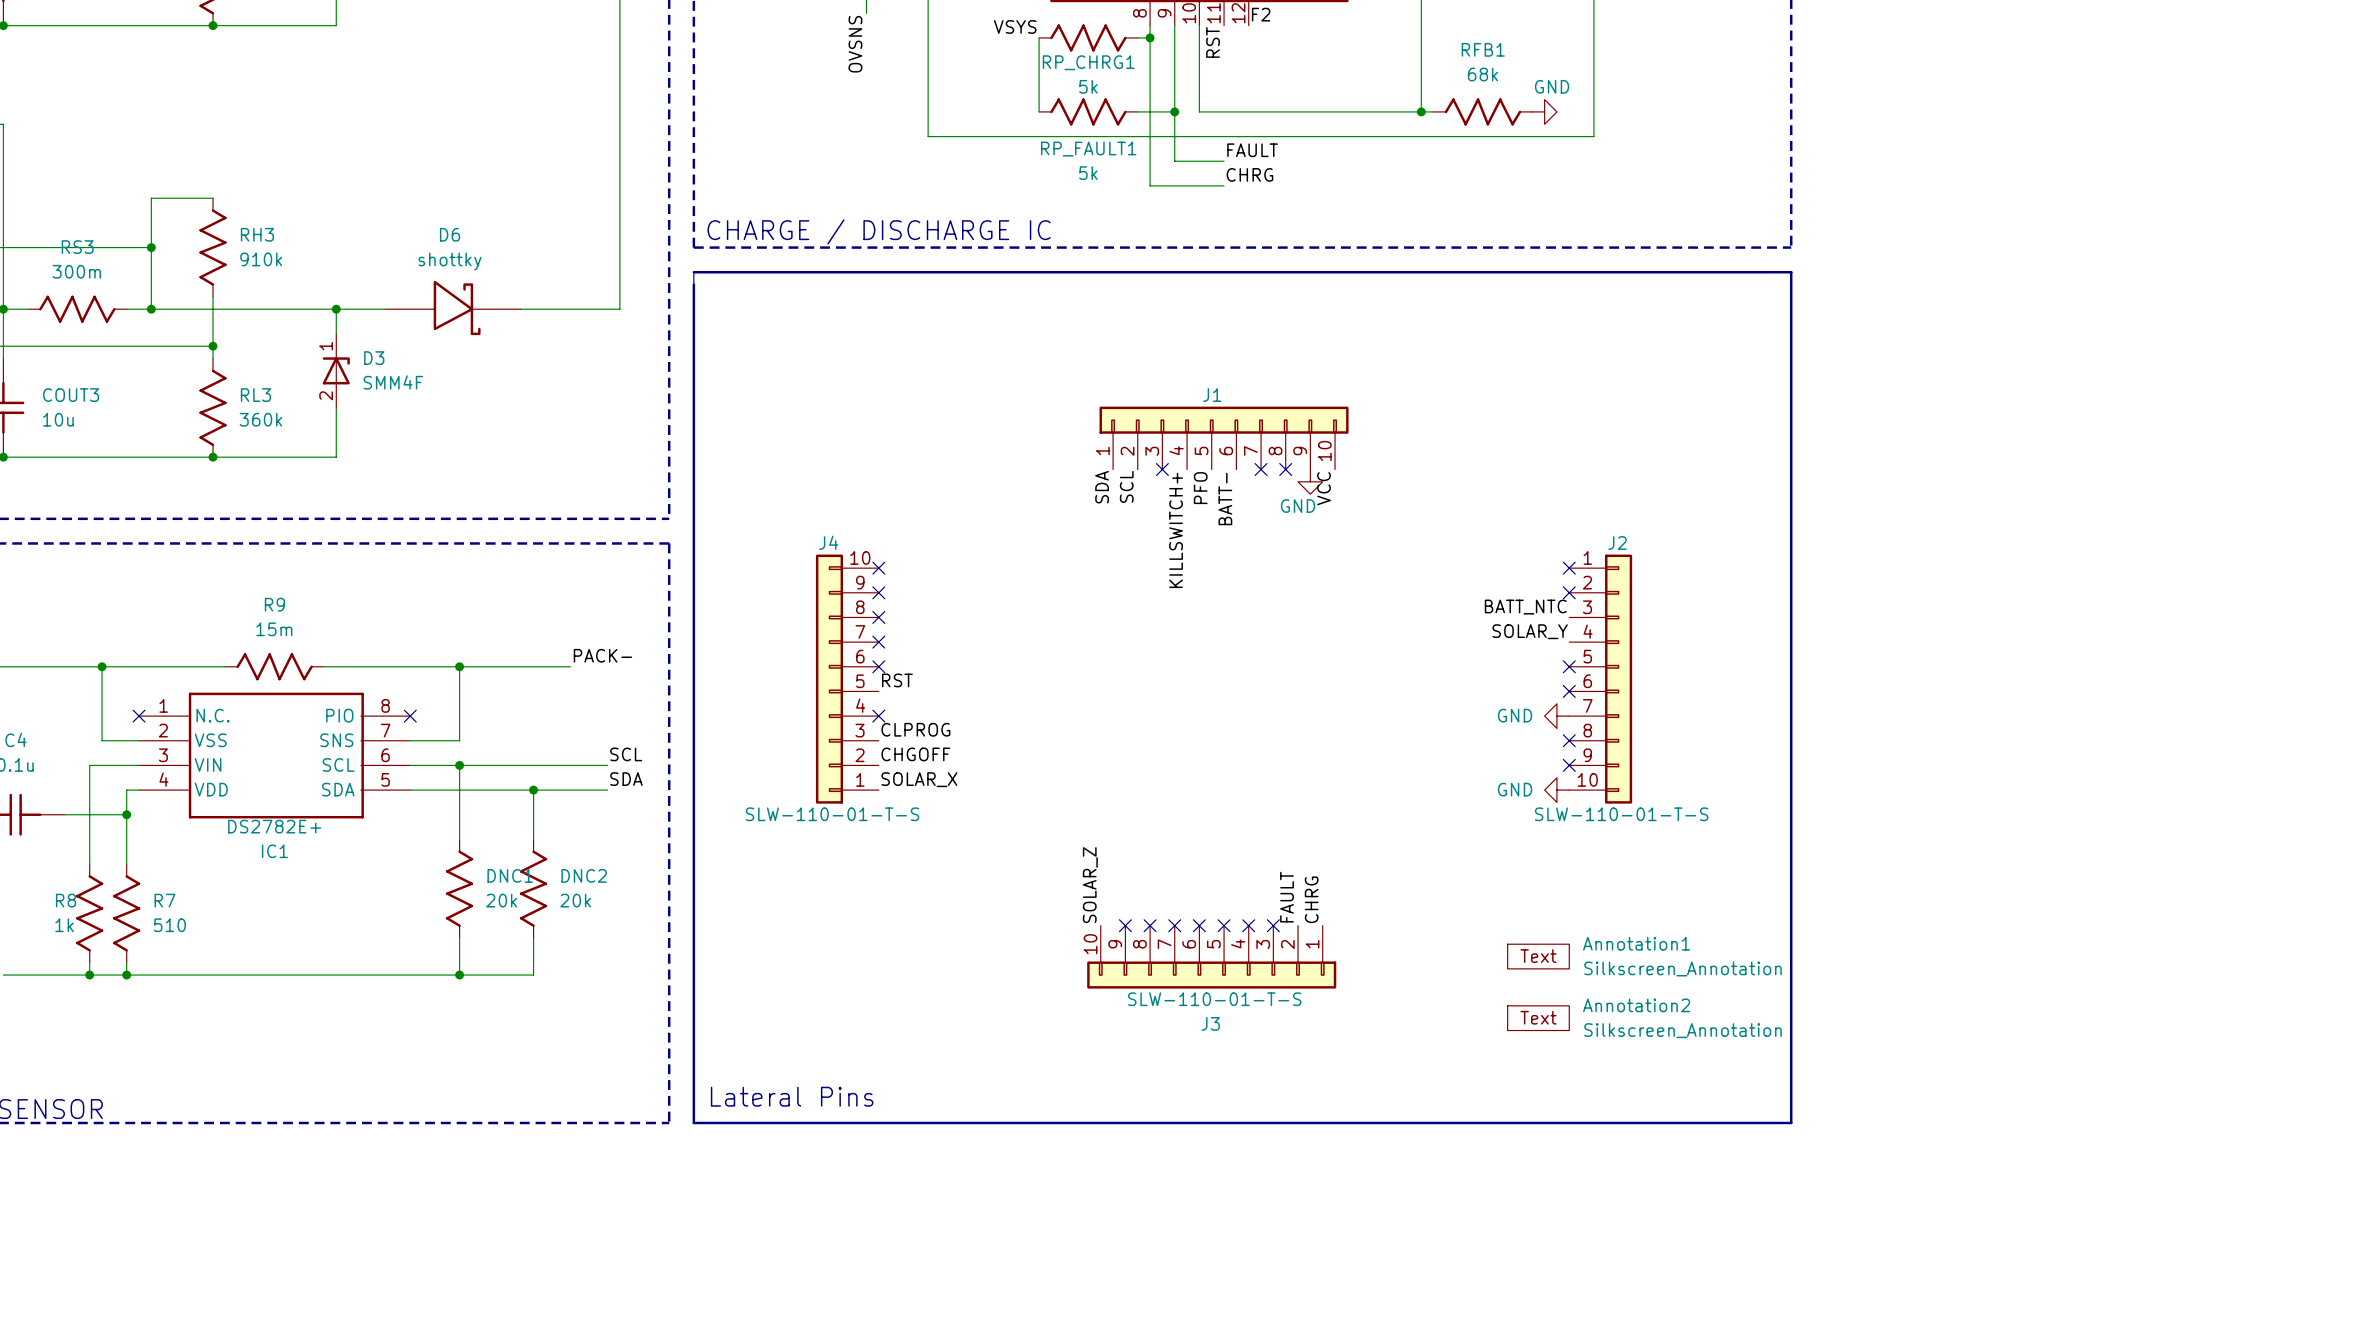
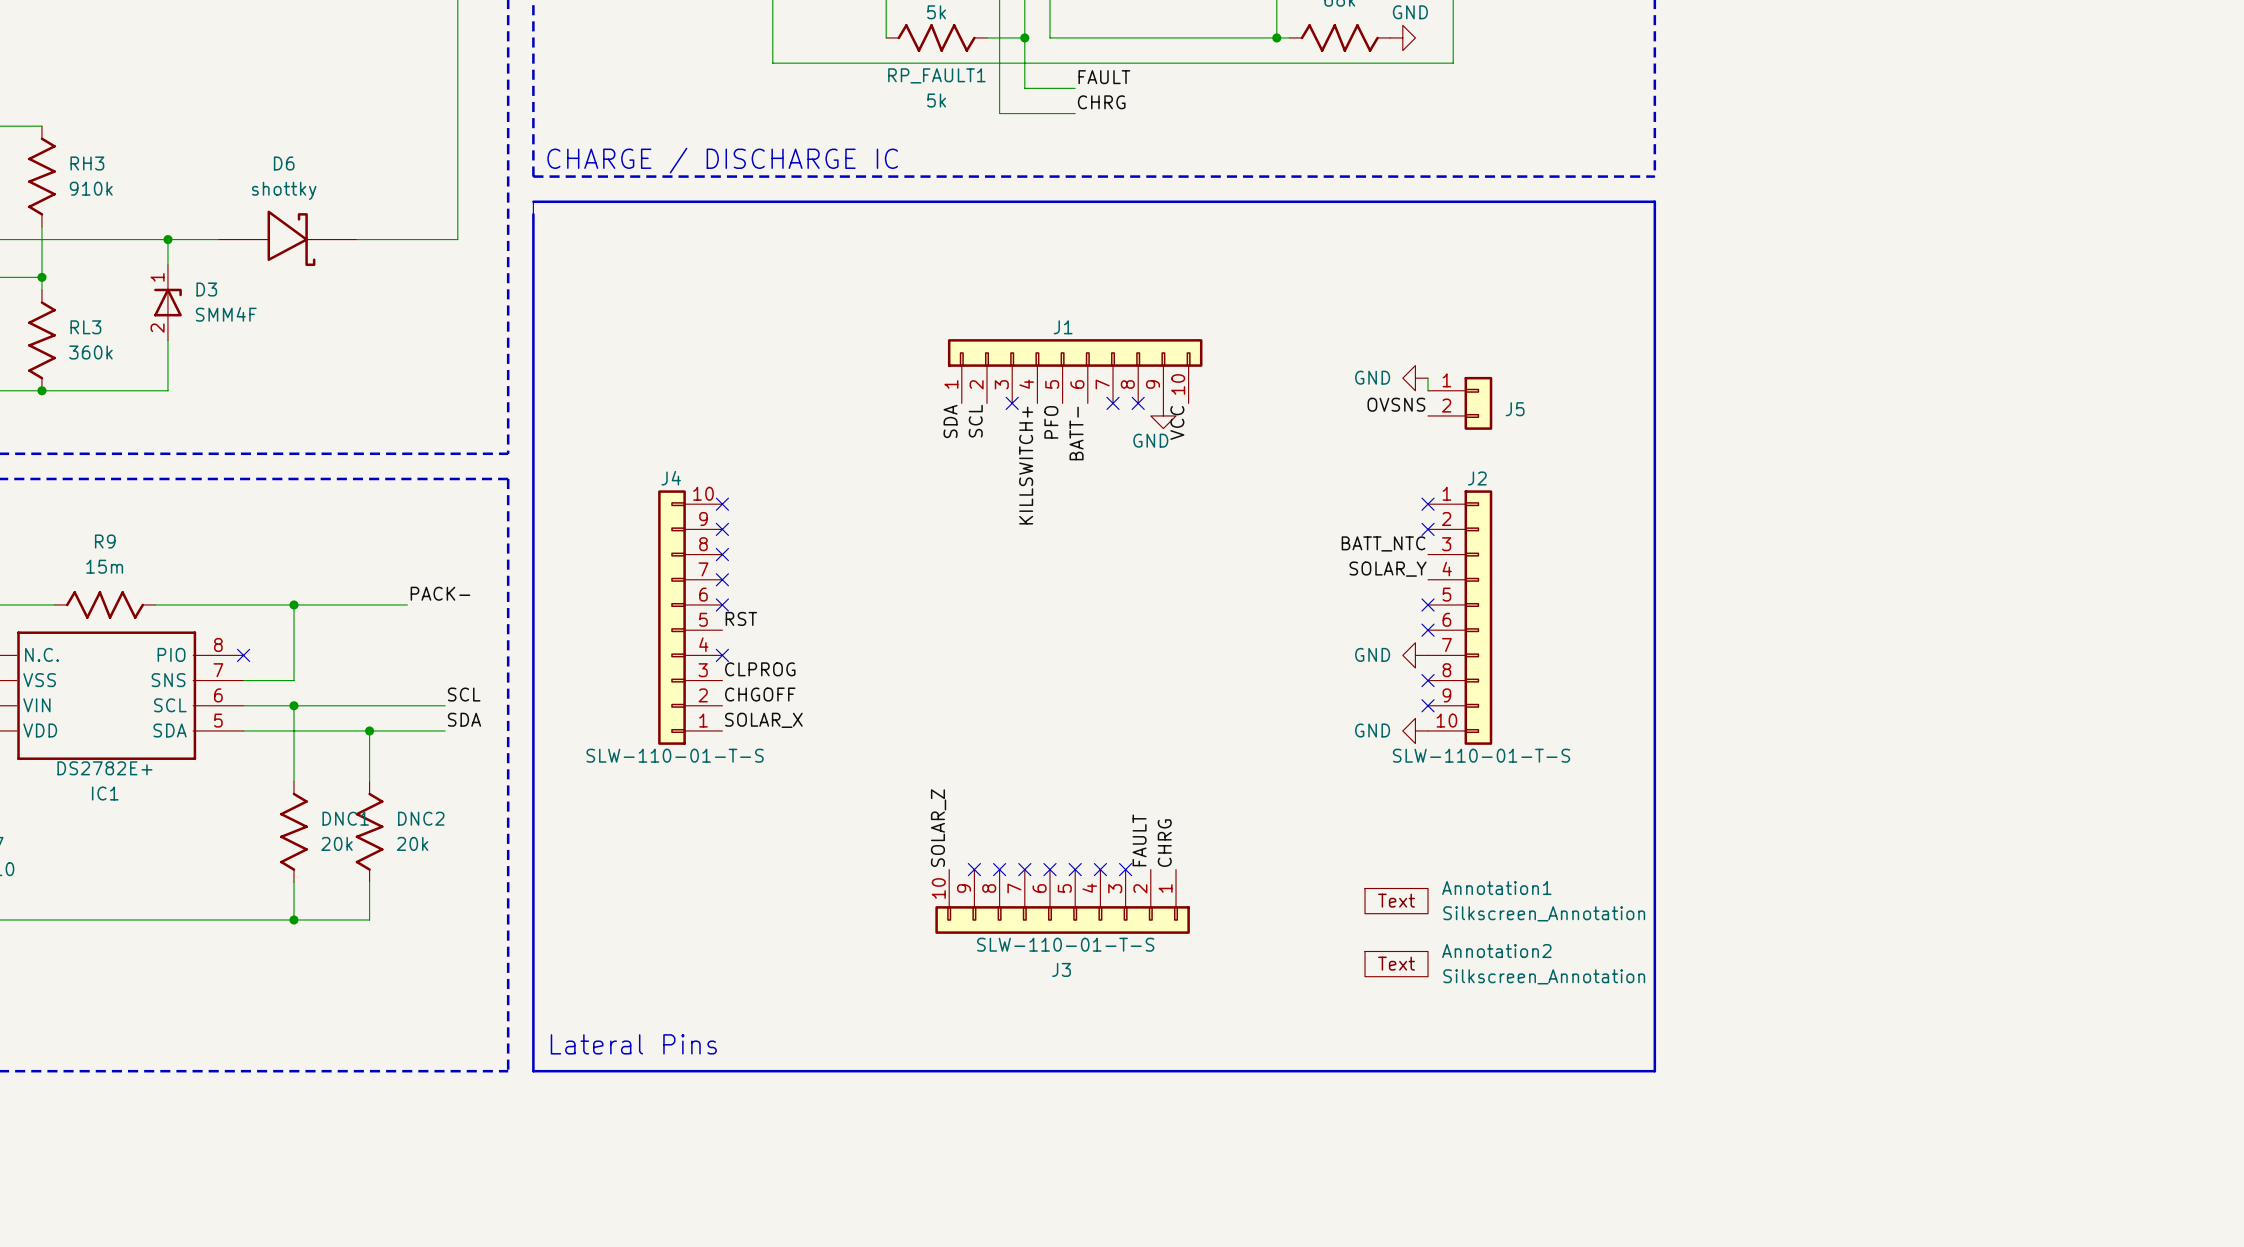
power symbol: none -> GND (1415, 378)
wire: none -> (1428, 378) (1428, 390)
J5: none -> (1460, 403)
label: none -> OVSNS (1396, 404)

